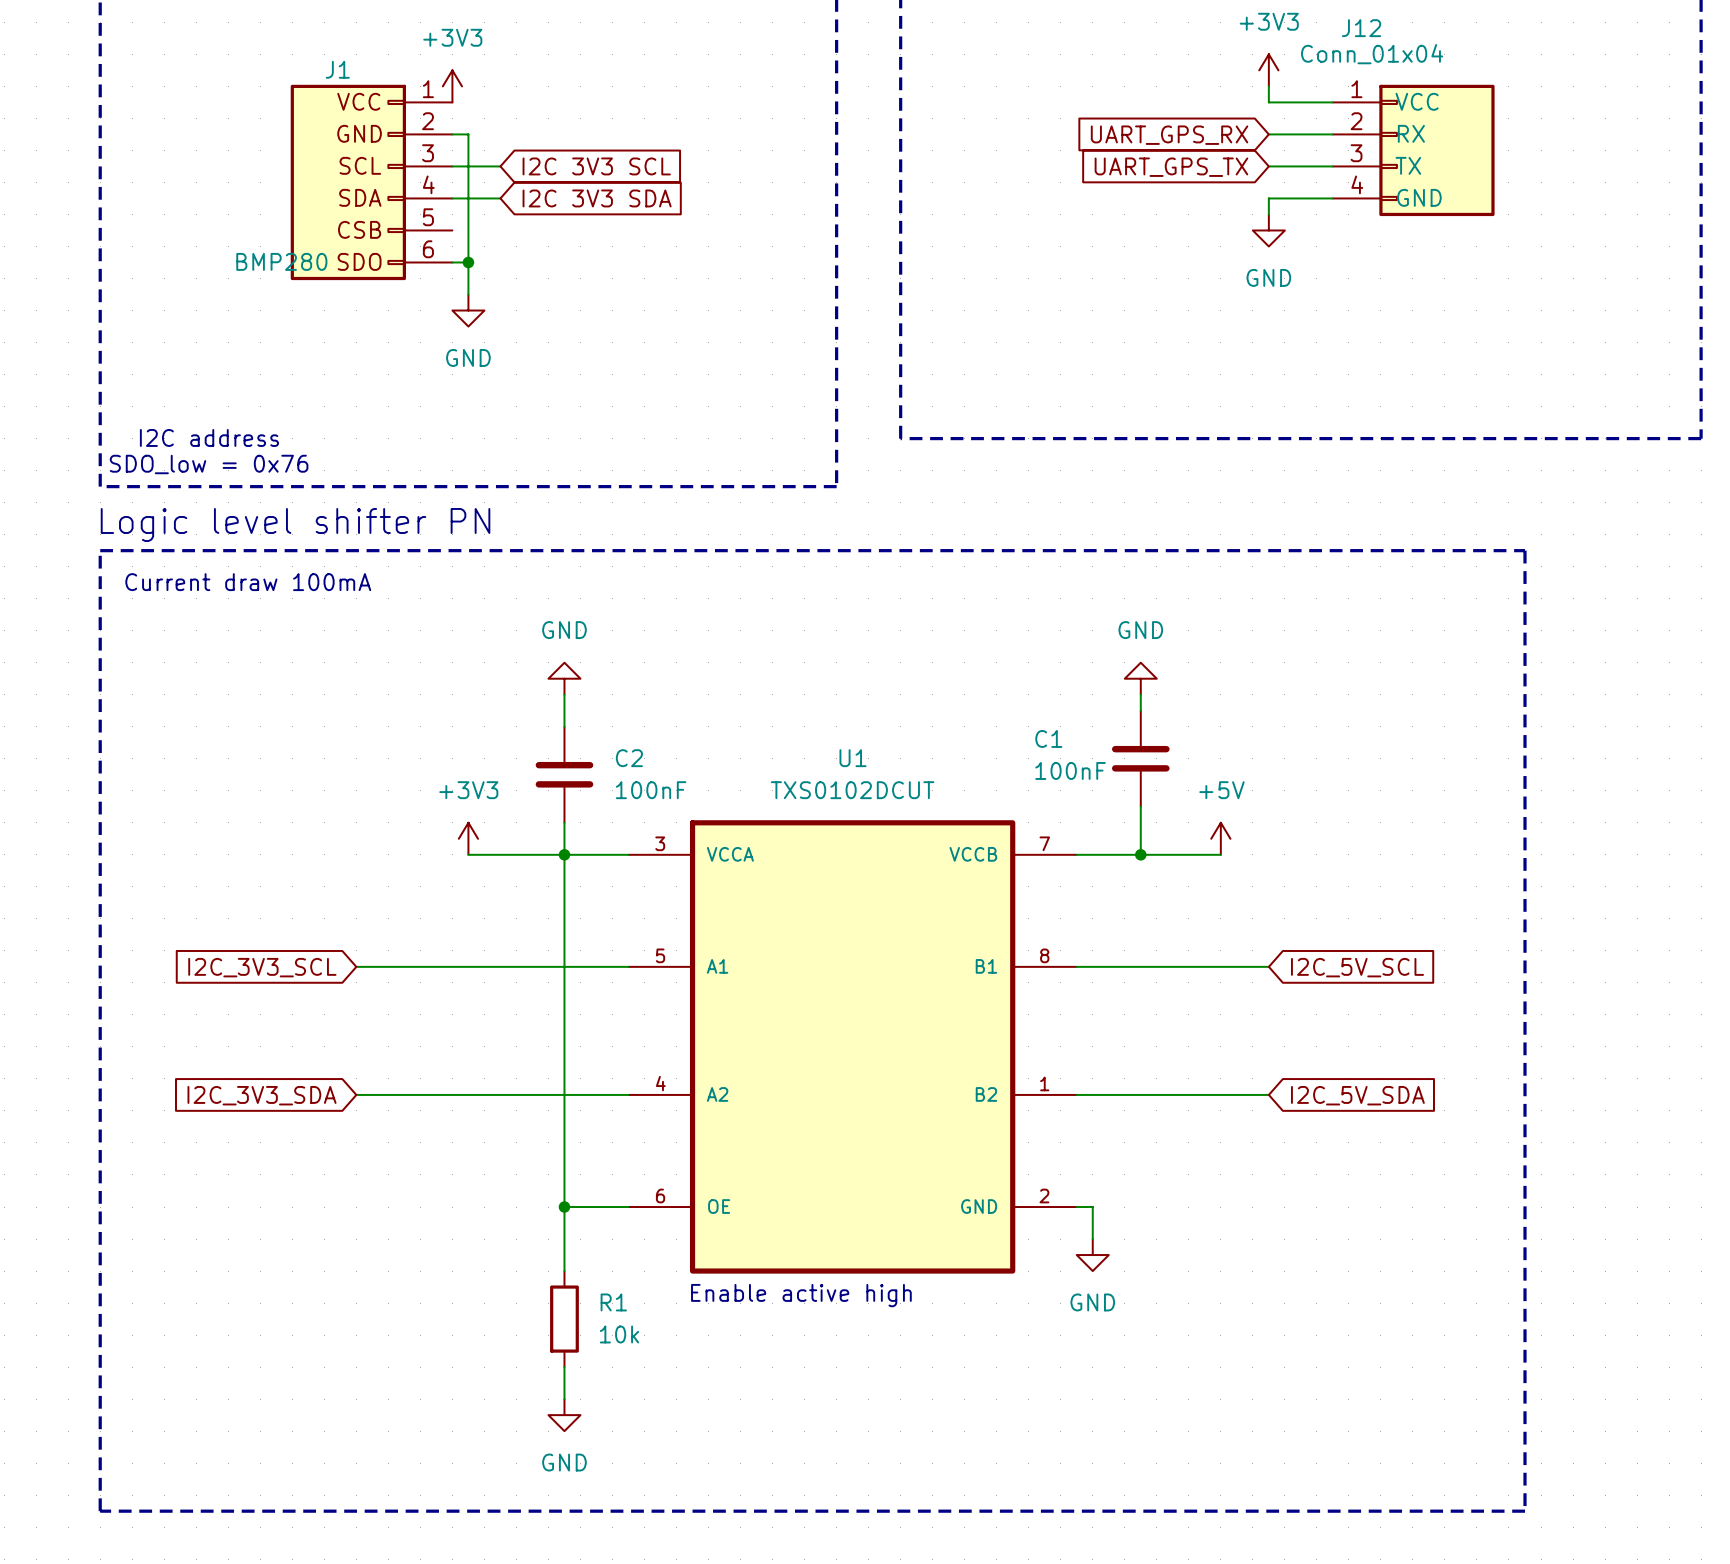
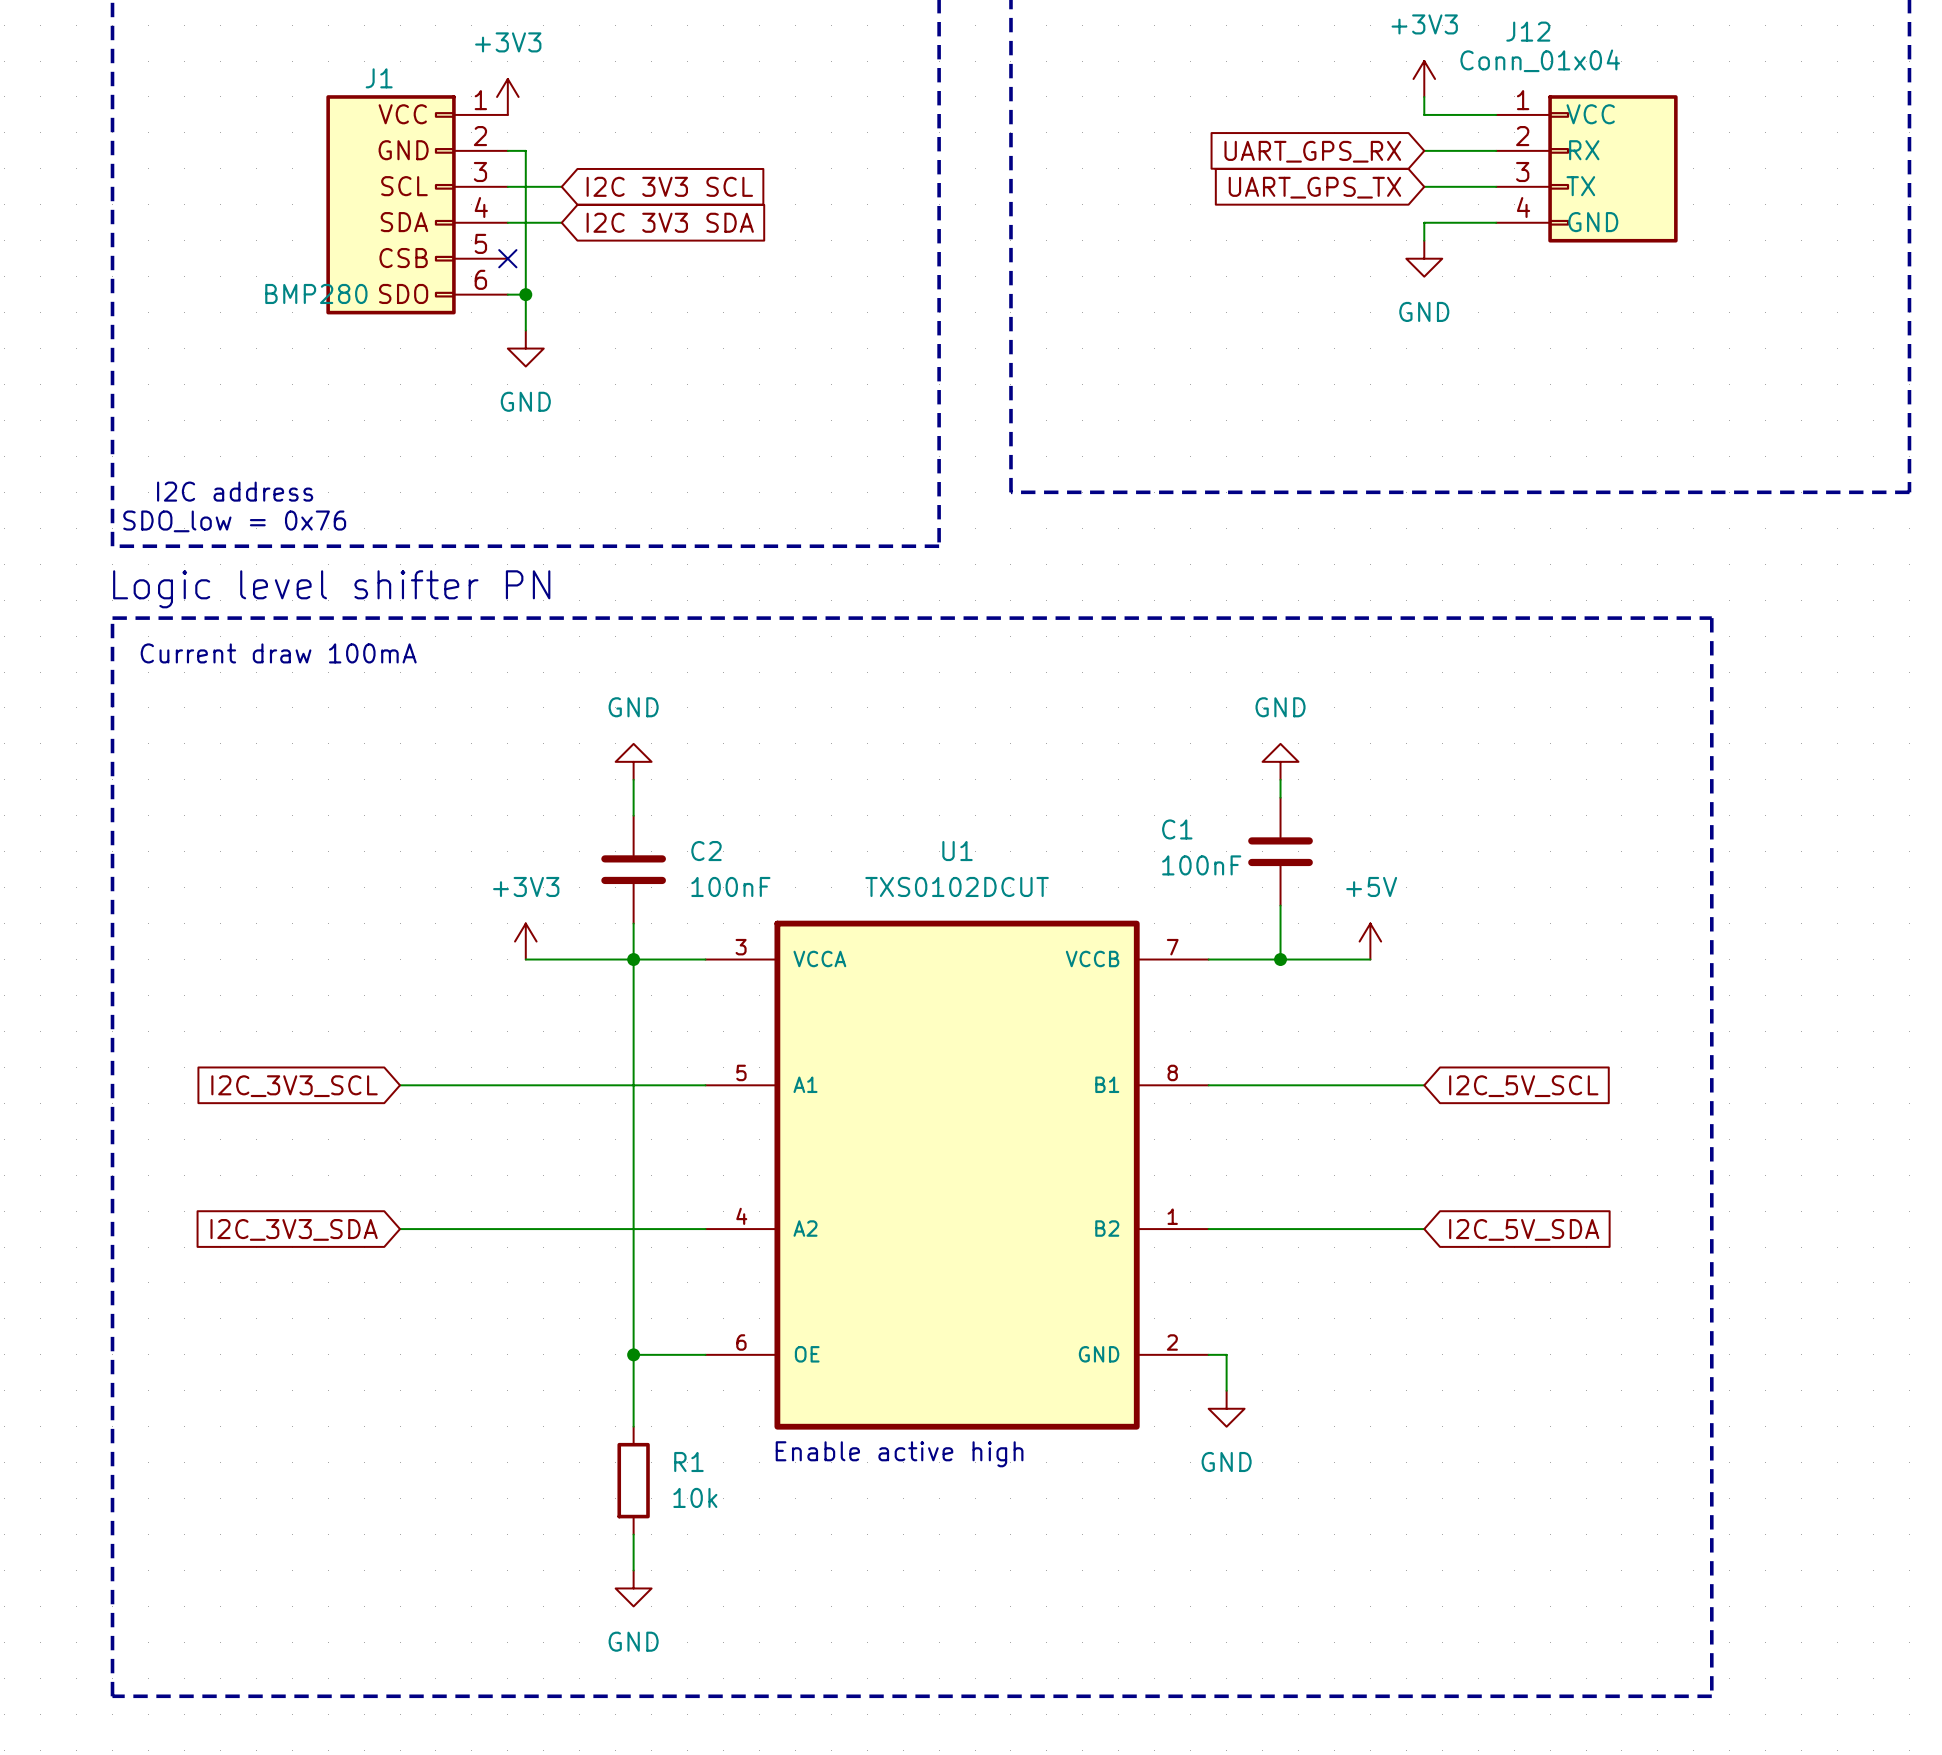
no-connect mark: none -> (507, 258)

